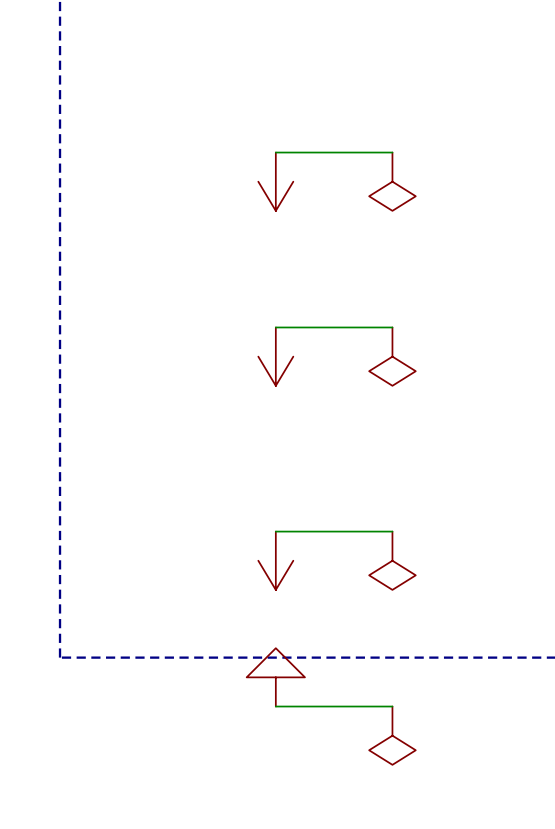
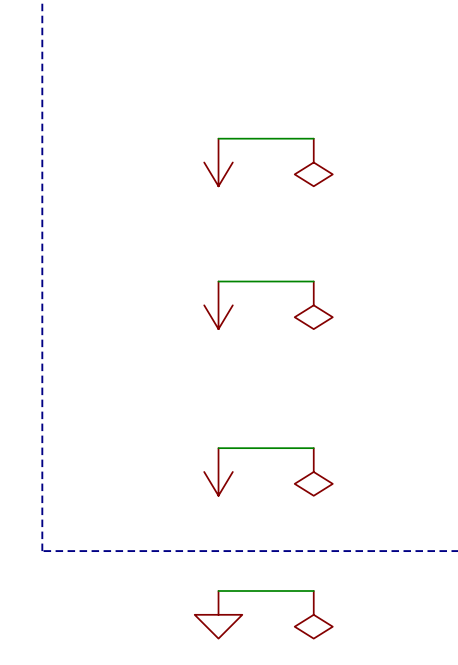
power symbol rotation: 0° (275, 677) -> 180° (218, 614)
power symbol position: (275, 677) -> (218, 614)

